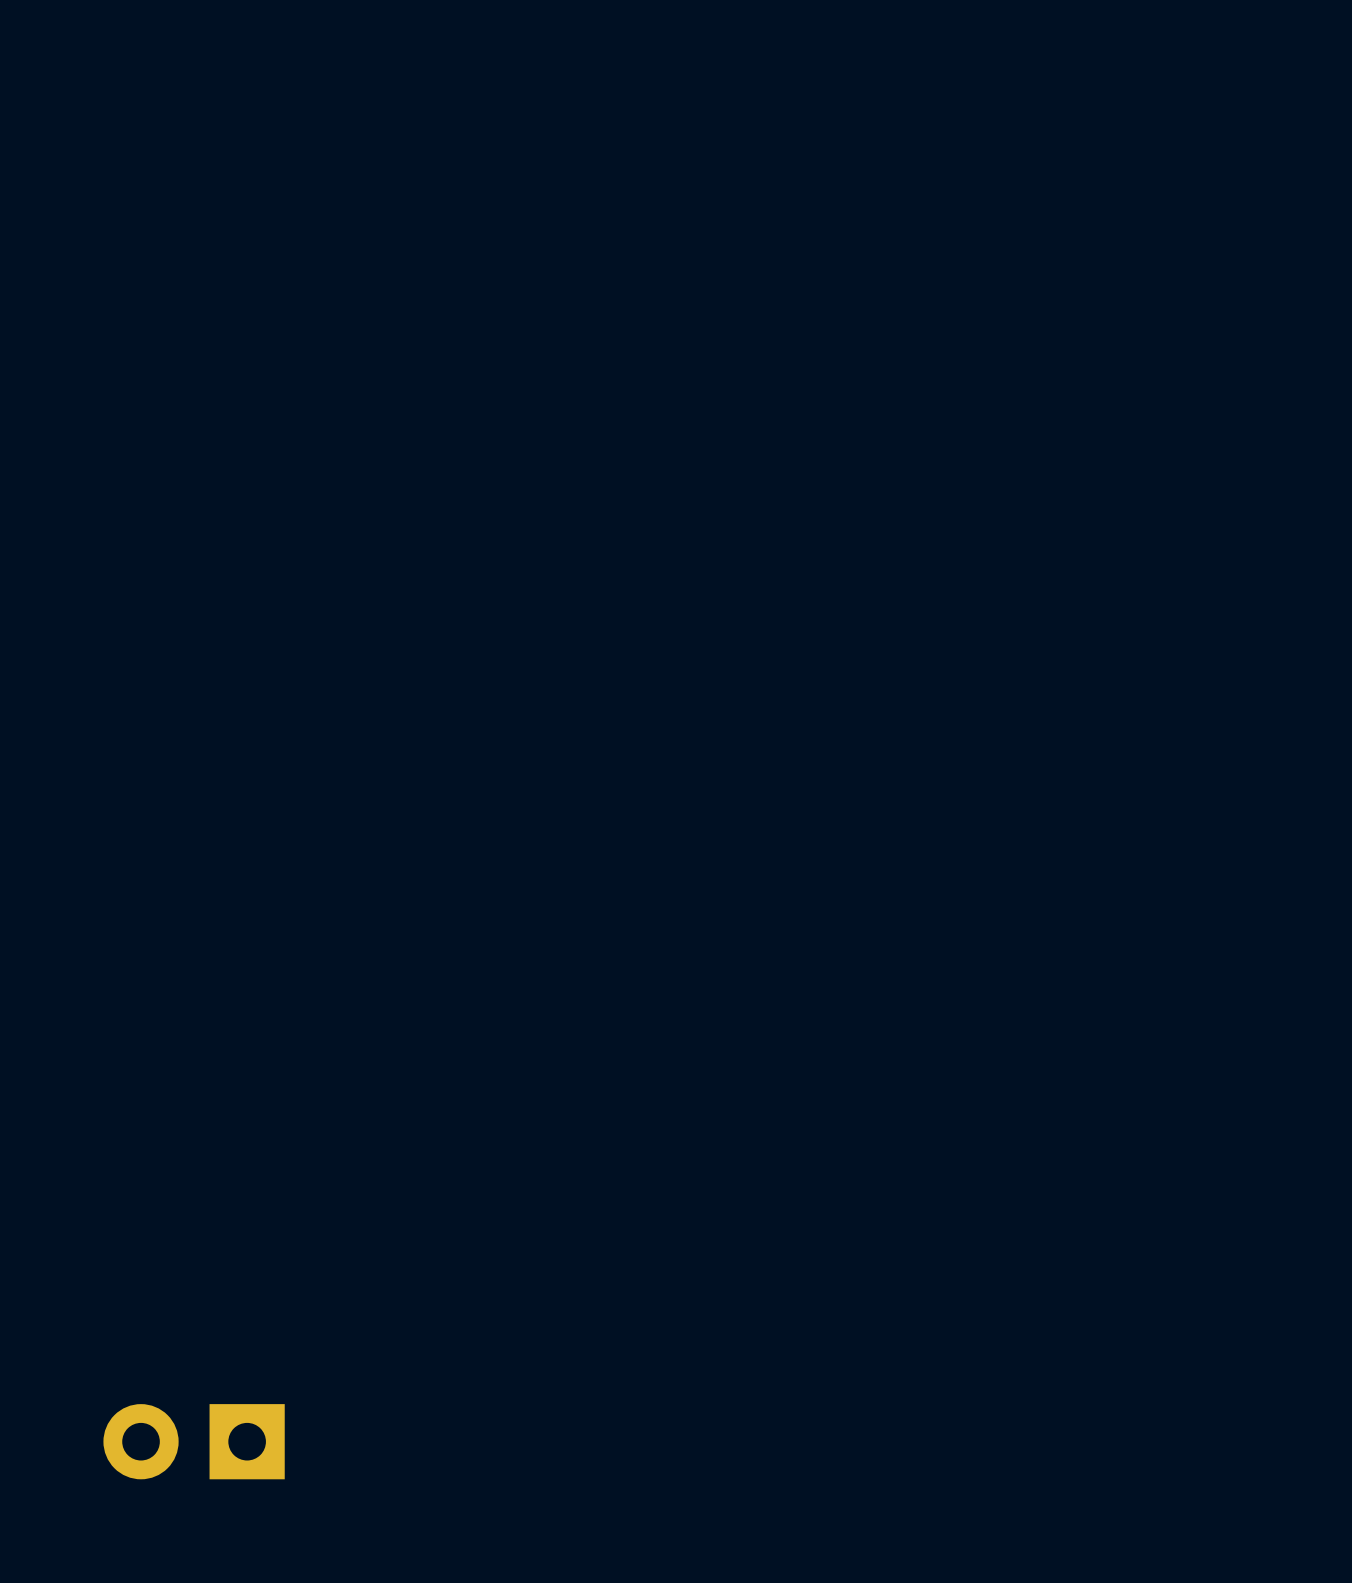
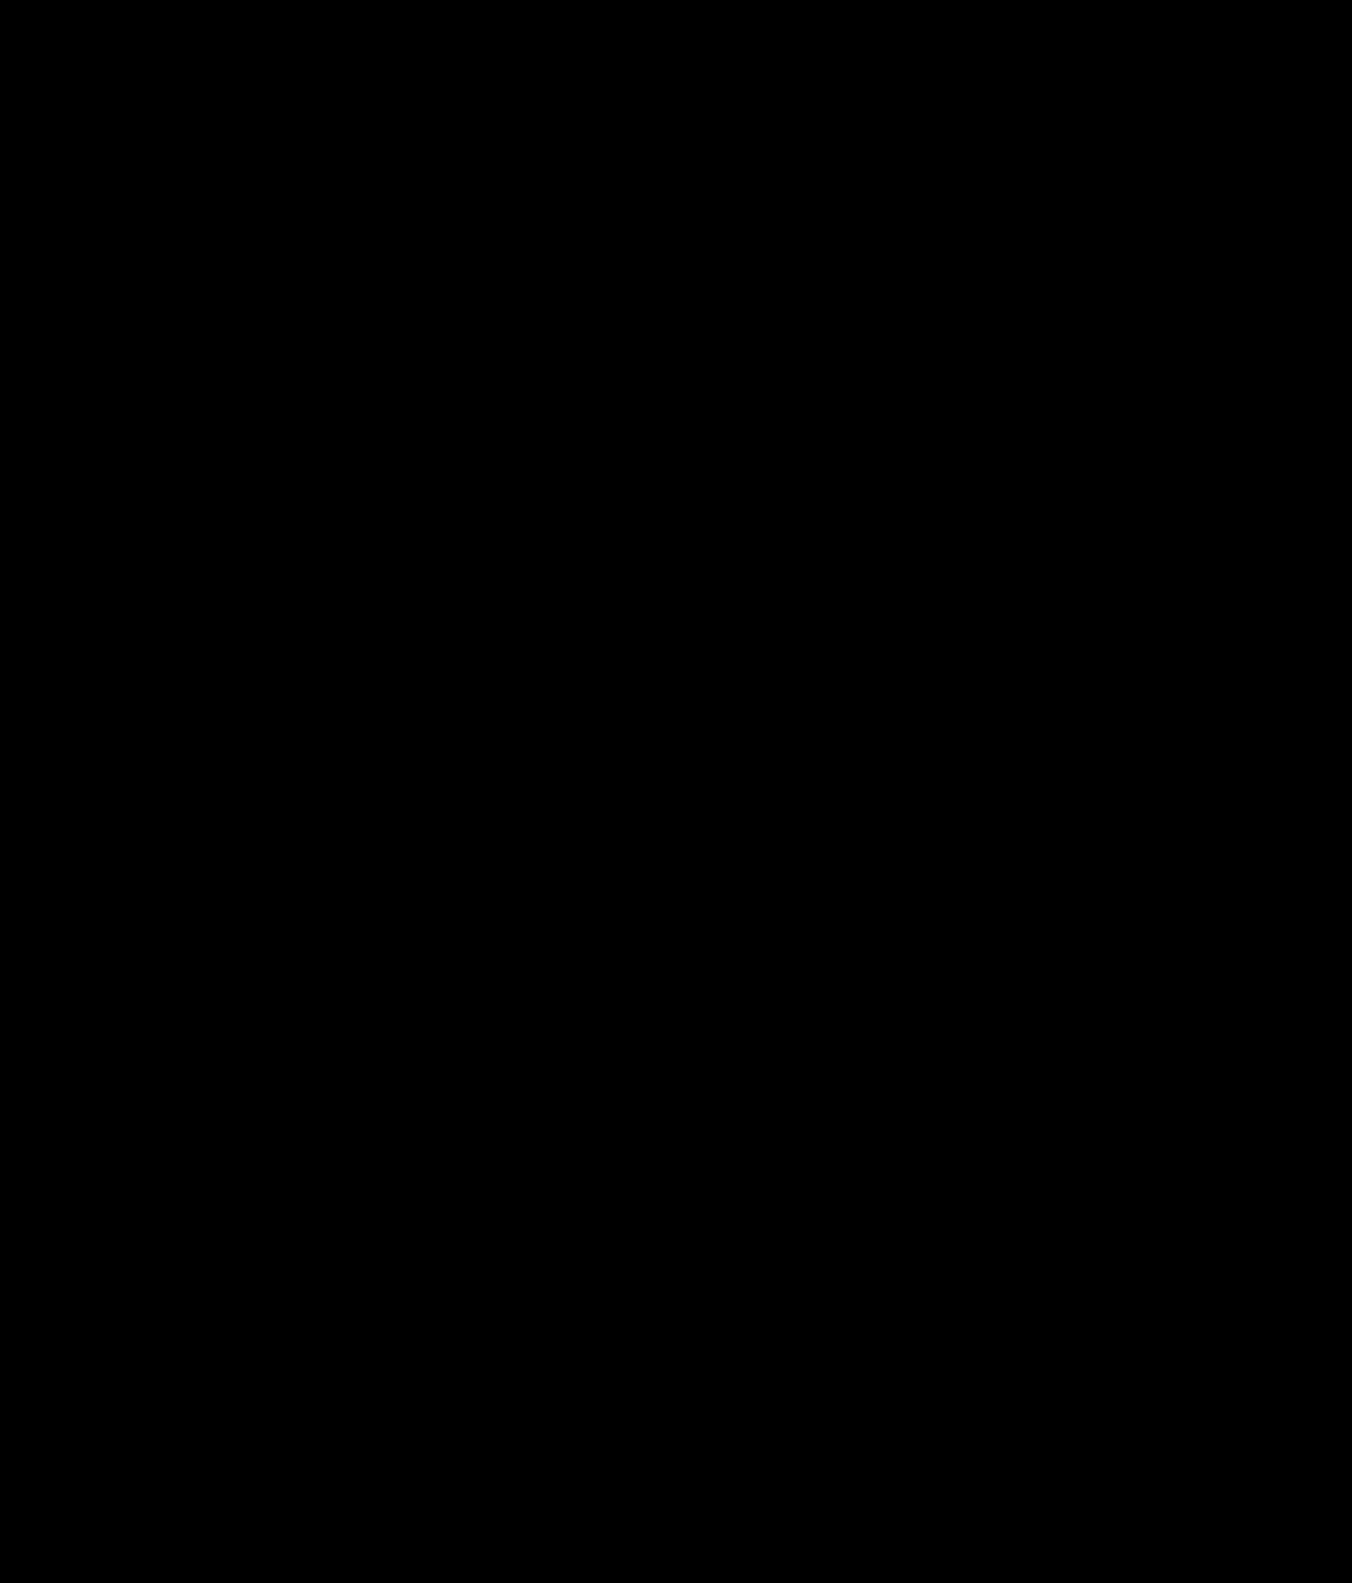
part: (194, 1441) -> none

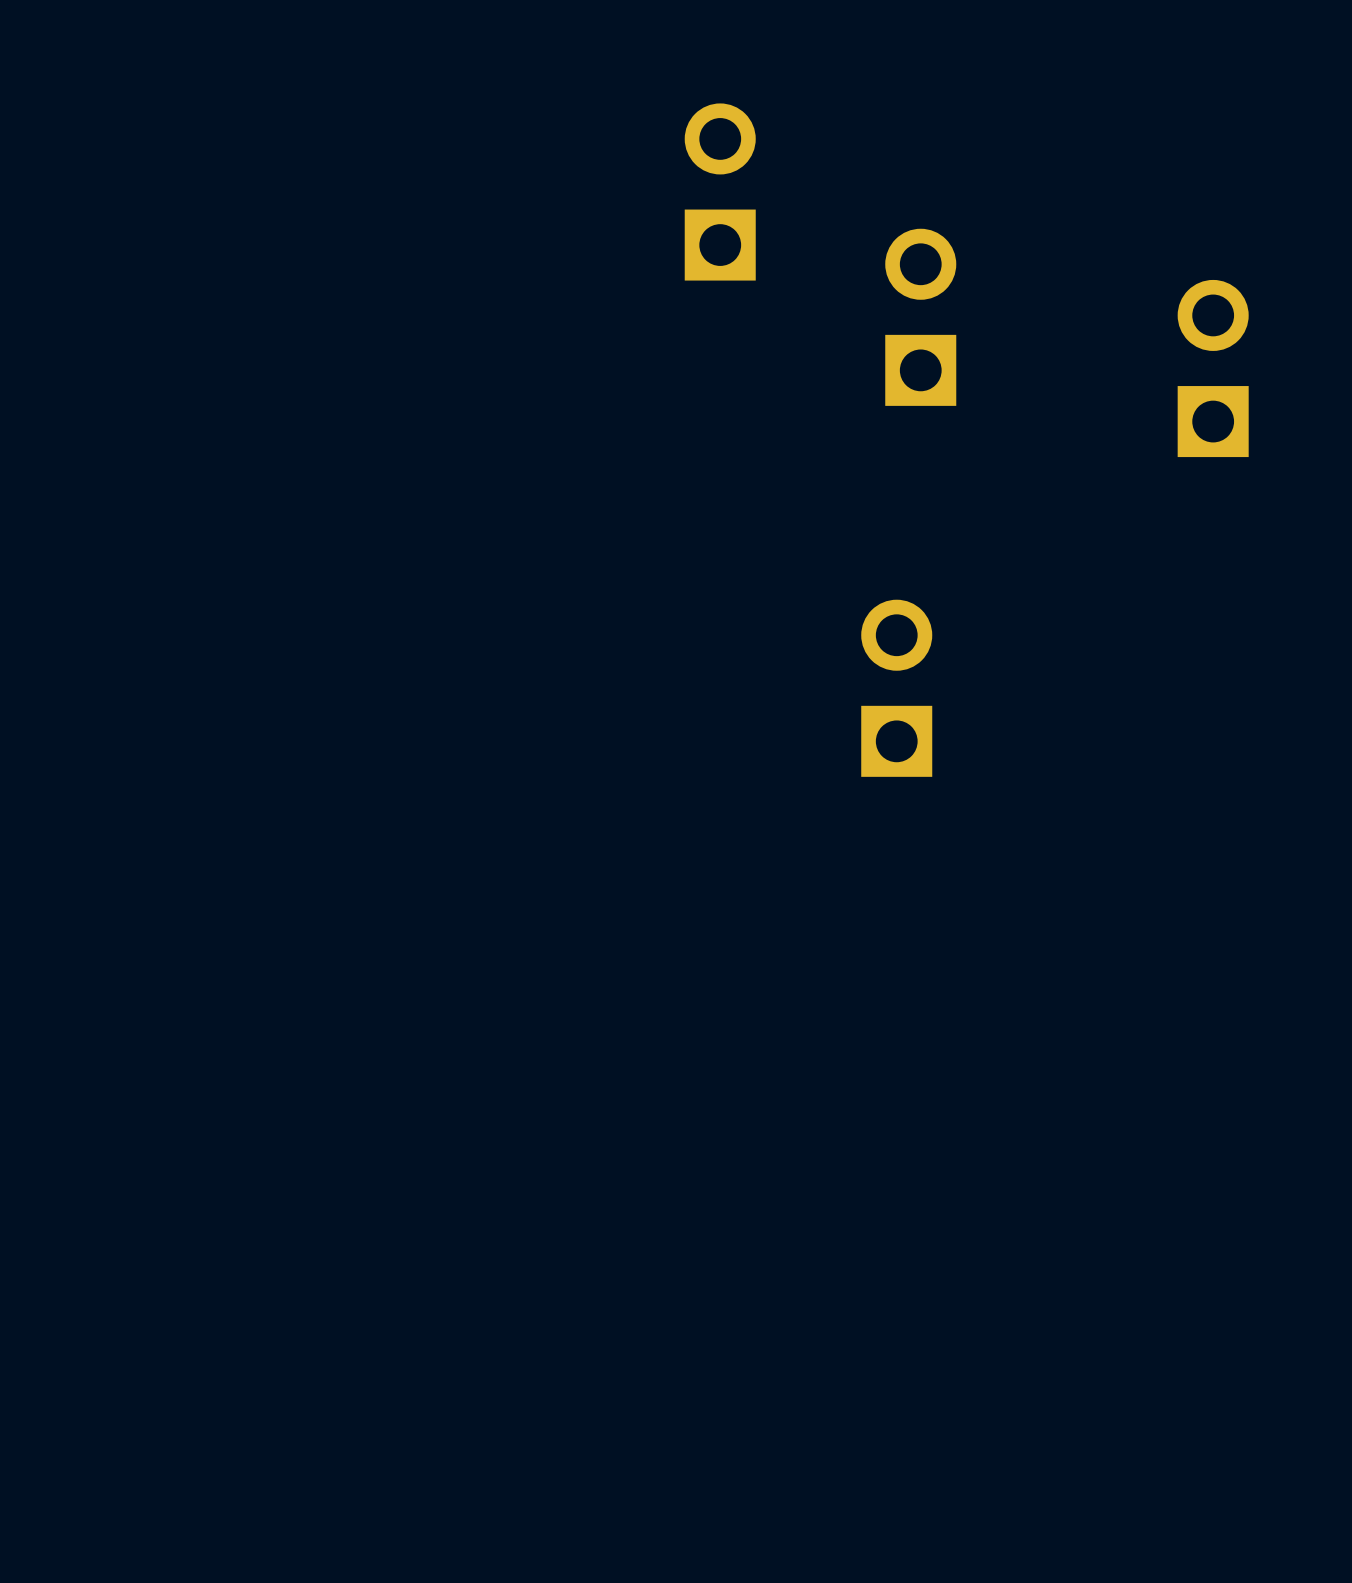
part: none -> (720, 192)
part: none -> (920, 317)
part: none -> (1213, 368)
part: none -> (896, 688)

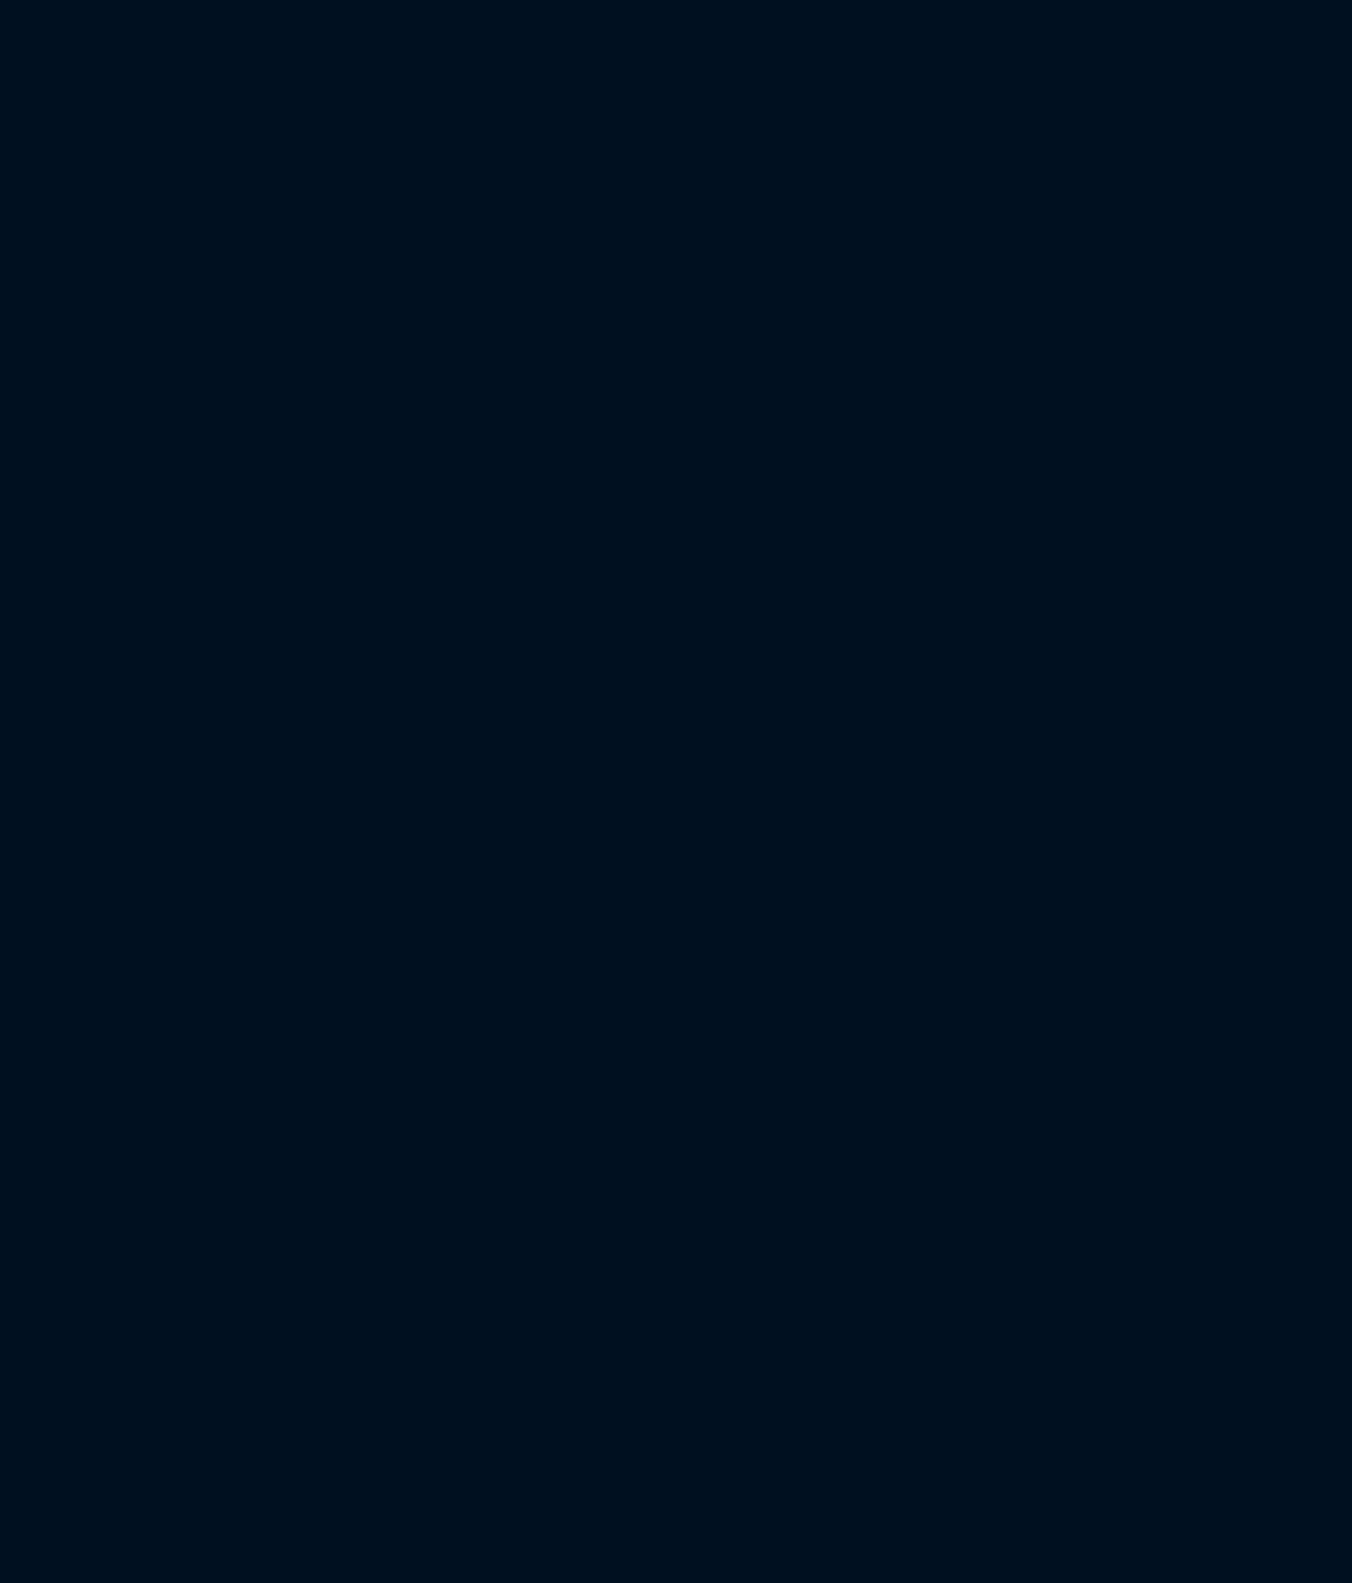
part: (720, 192) -> none
part: (920, 317) -> none
part: (1213, 368) -> none
part: (896, 688) -> none

